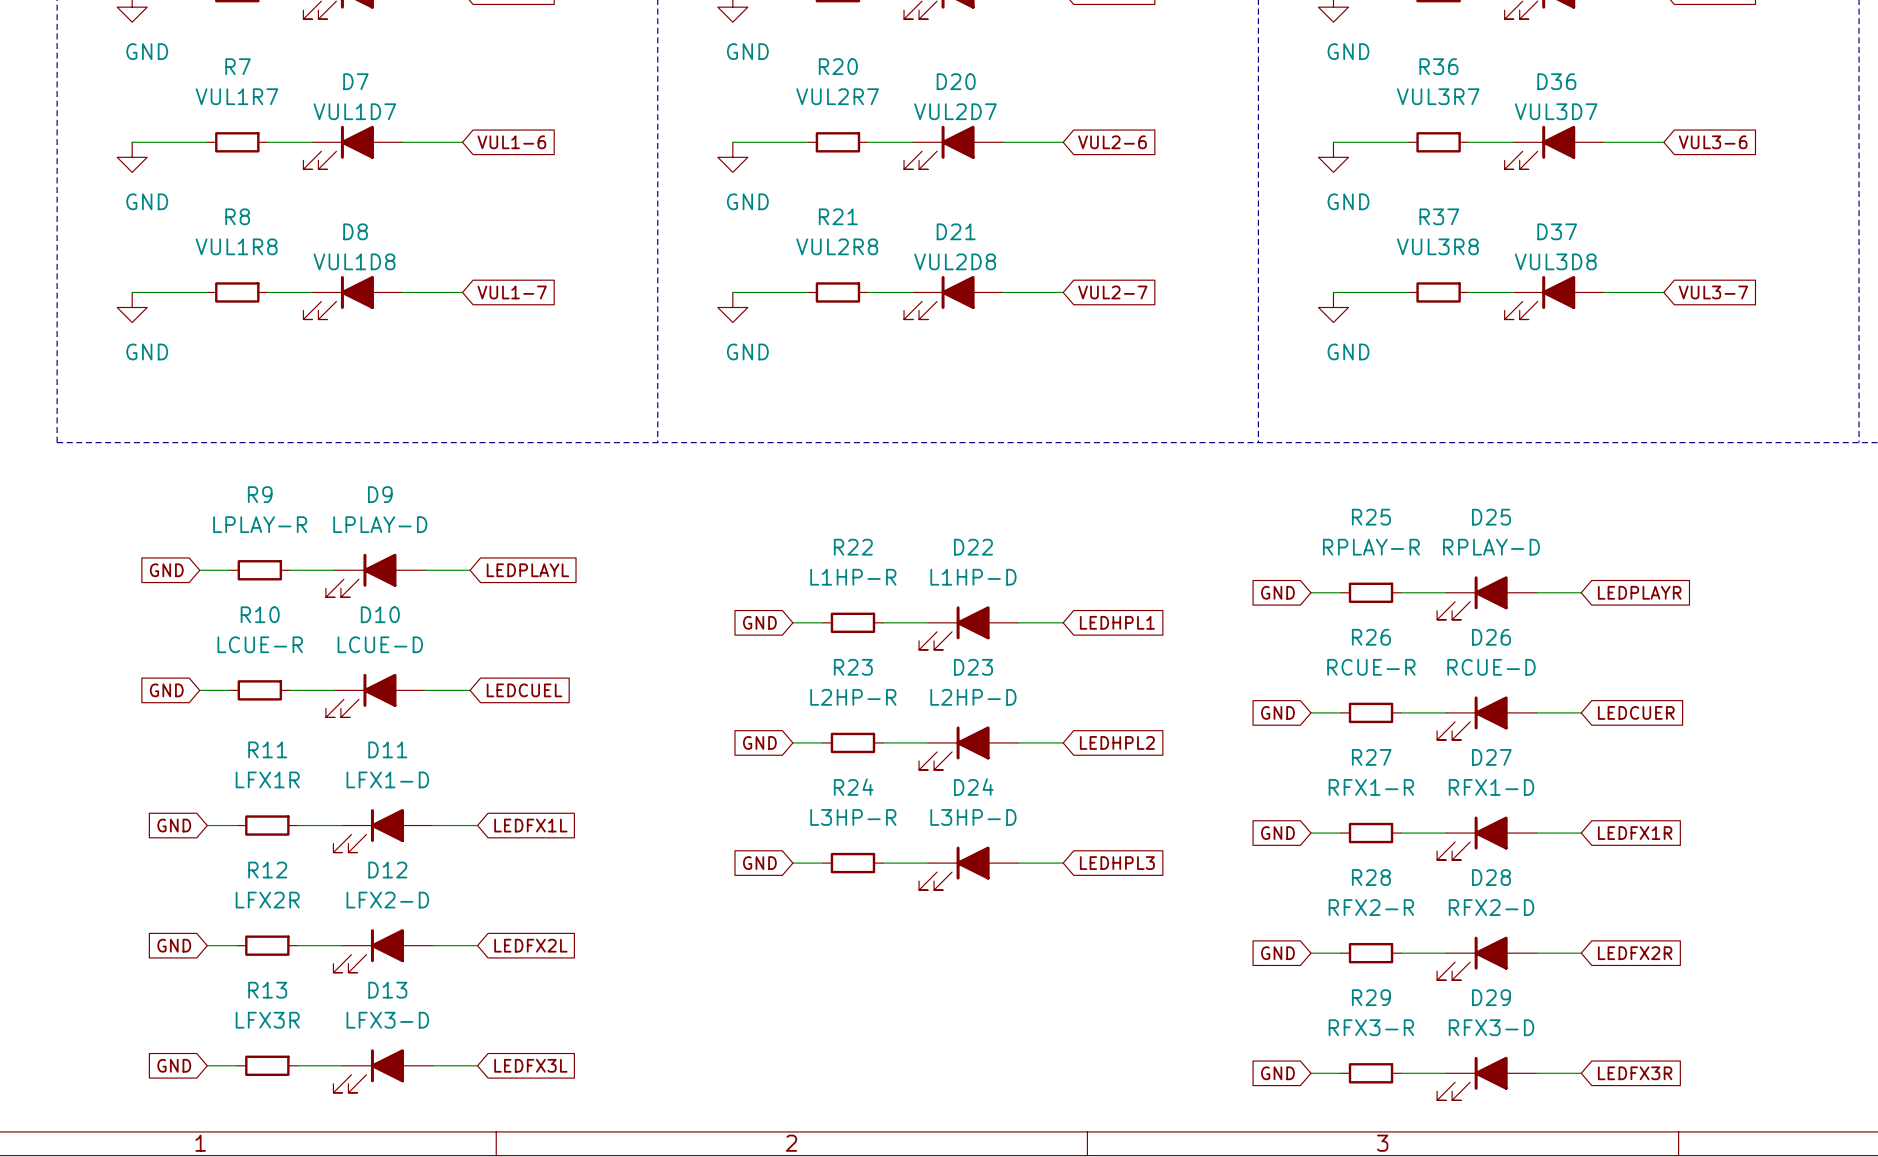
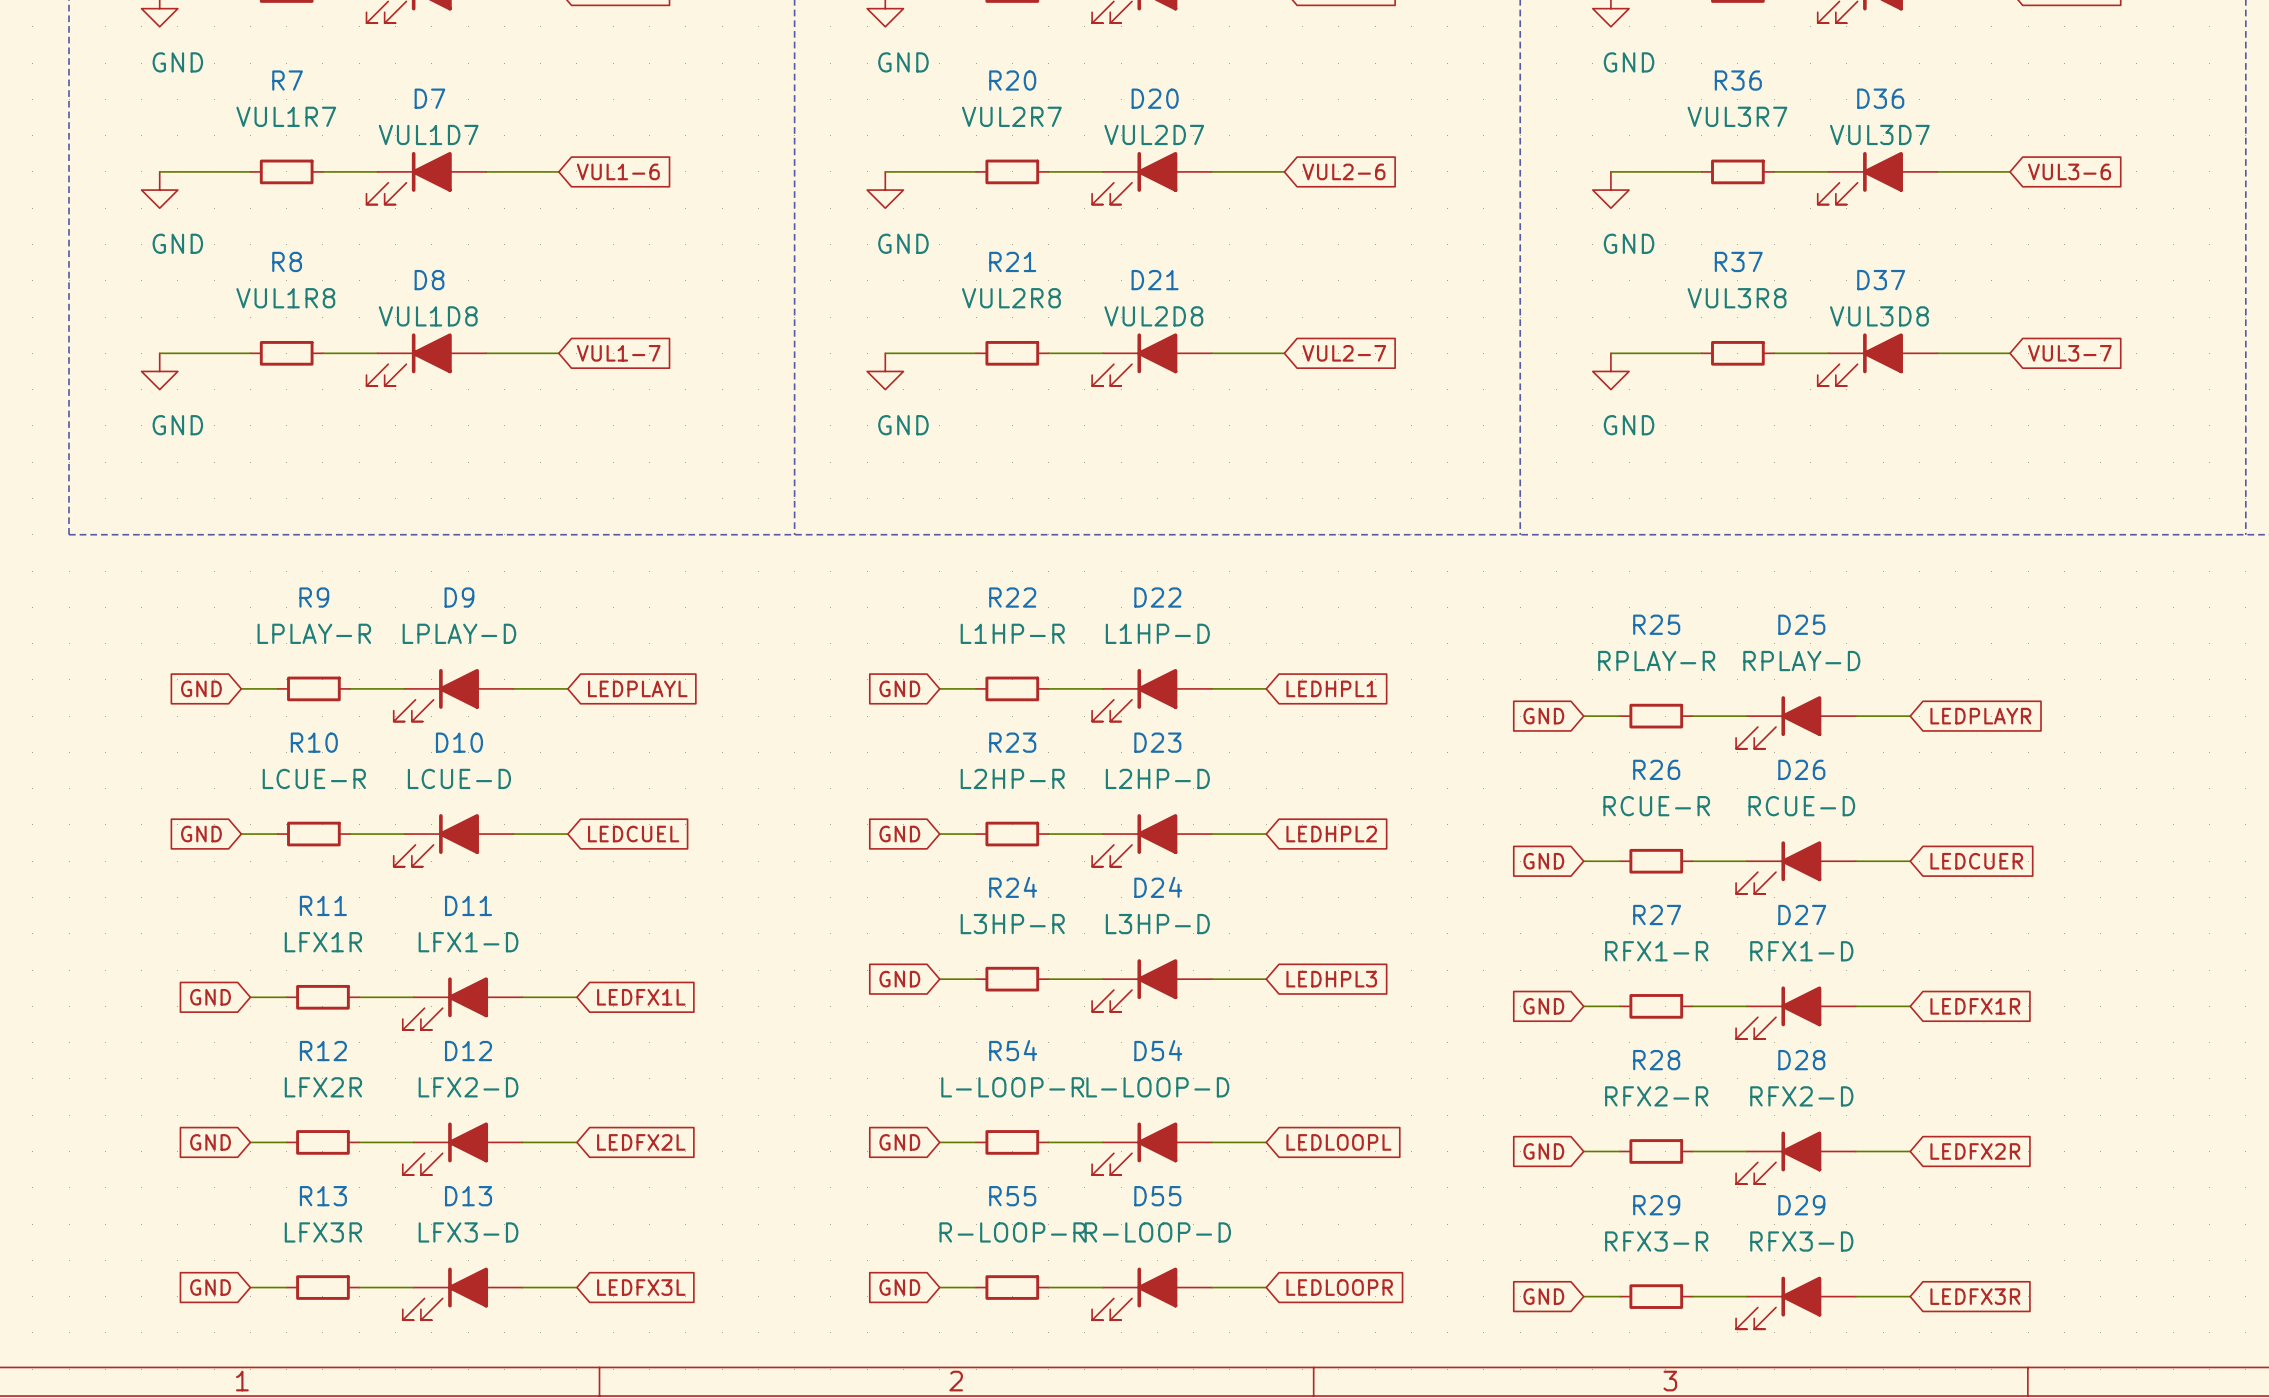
global label: none -> GND (899, 688)
global label: GND (759, 622) -> none
wire: (792, 622) (822, 622) -> (939, 688) (976, 688)
R22 position: (852, 622) -> (1012, 688)
wire: (883, 622) (928, 622) -> (1048, 688) (1102, 688)
wire: (1018, 622) (1063, 622) -> (1211, 688) (1266, 688)
global label position: LEDHPL1 (1117, 622) -> LEDHPL1 (1331, 688)
D22 position: (968, 628) -> (1151, 695)
global label: none -> GND (899, 834)
global label: GND (759, 742) -> none
wire: (792, 742) (822, 742) -> (939, 834) (976, 834)
R23 position: (852, 742) -> (1012, 834)
wire: (883, 742) (928, 742) -> (1048, 834) (1102, 834)
wire: (1018, 742) (1063, 742) -> (1211, 834) (1266, 834)
global label position: LEDHPL2 (1117, 742) -> LEDHPL2 (1331, 834)
D23 position: (968, 748) -> (1151, 840)
global label: none -> GND (899, 979)
global label: GND (759, 863) -> none
wire: (792, 863) (822, 863) -> (939, 979) (976, 979)
R24 position: (852, 863) -> (1012, 979)
wire: (883, 863) (928, 863) -> (1048, 979) (1102, 979)
wire: (1018, 863) (1063, 863) -> (1211, 979) (1266, 979)
global label position: LEDHPL3 (1117, 863) -> LEDHPL3 (1331, 979)
D24 position: (968, 868) -> (1151, 985)
global label: none -> GND (899, 1142)
wire: none -> (939, 1142) (976, 1142)
R54: none -> L-LOOP-R (1012, 1142)
wire: none -> (1048, 1142) (1102, 1142)
wire: none -> (1211, 1142) (1266, 1142)
global label: none -> LEDLOOPL (1338, 1142)
D54: none -> L-LOOP-D (1151, 1148)
global label: none -> GND (899, 1287)
wire: none -> (939, 1287) (976, 1287)
R55: none -> R-LOOP-R (1012, 1287)
wire: none -> (1048, 1287) (1102, 1287)
wire: none -> (1211, 1287) (1266, 1287)
global label: none -> LEDLOOPR (1339, 1287)
D55: none -> R-LOOP-D (1151, 1293)

